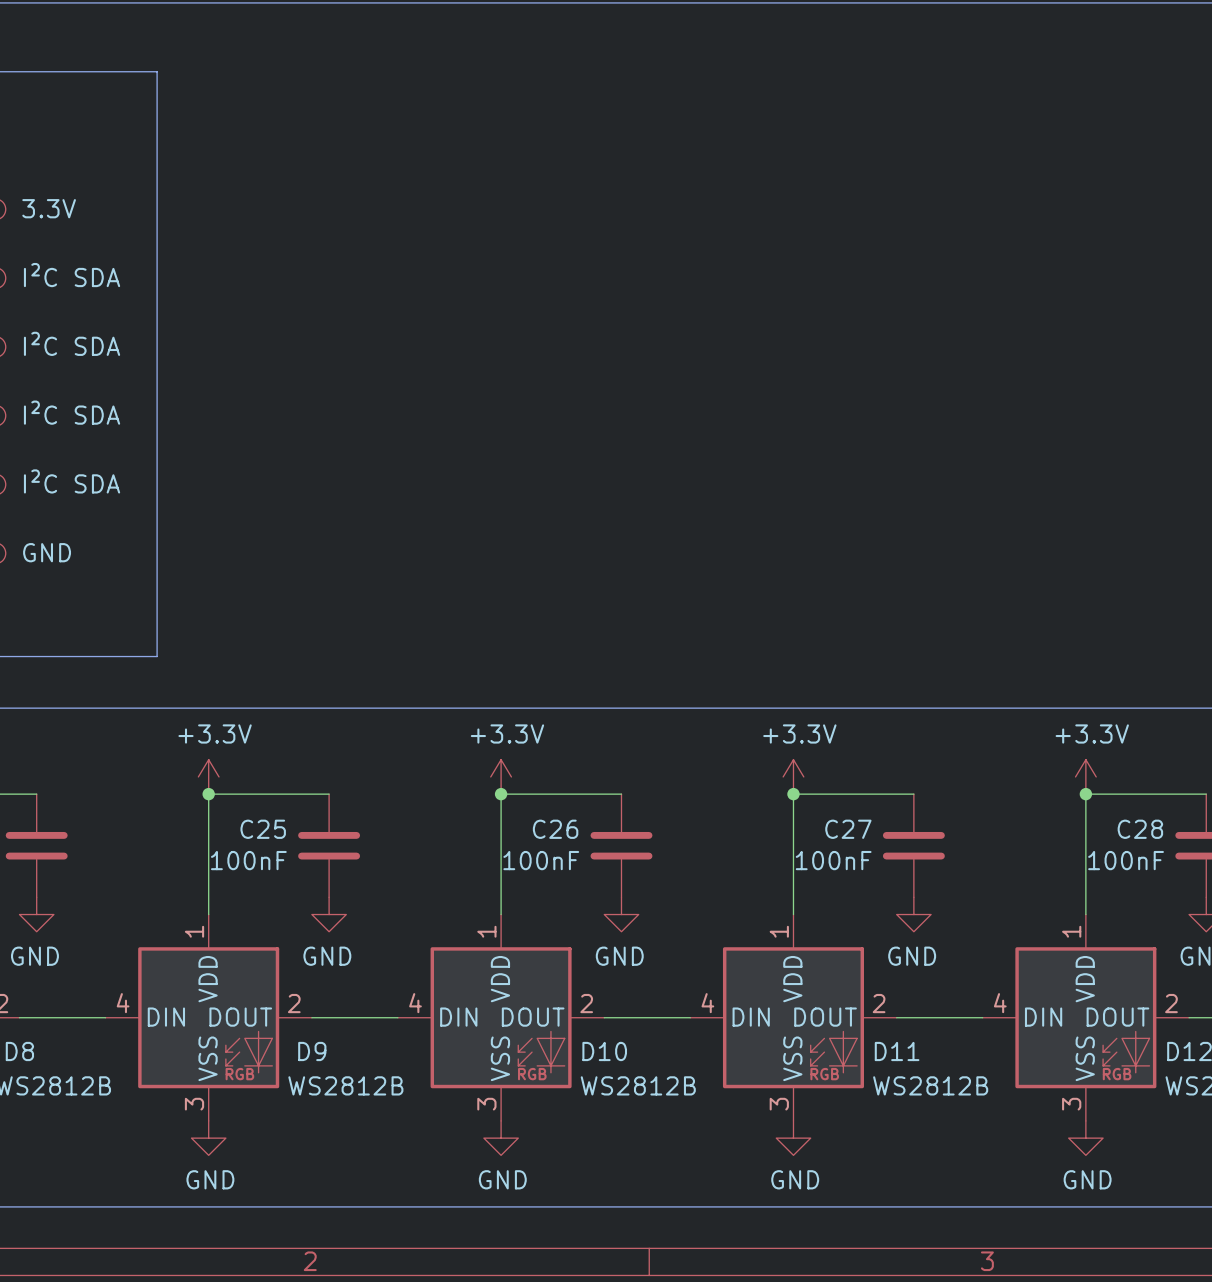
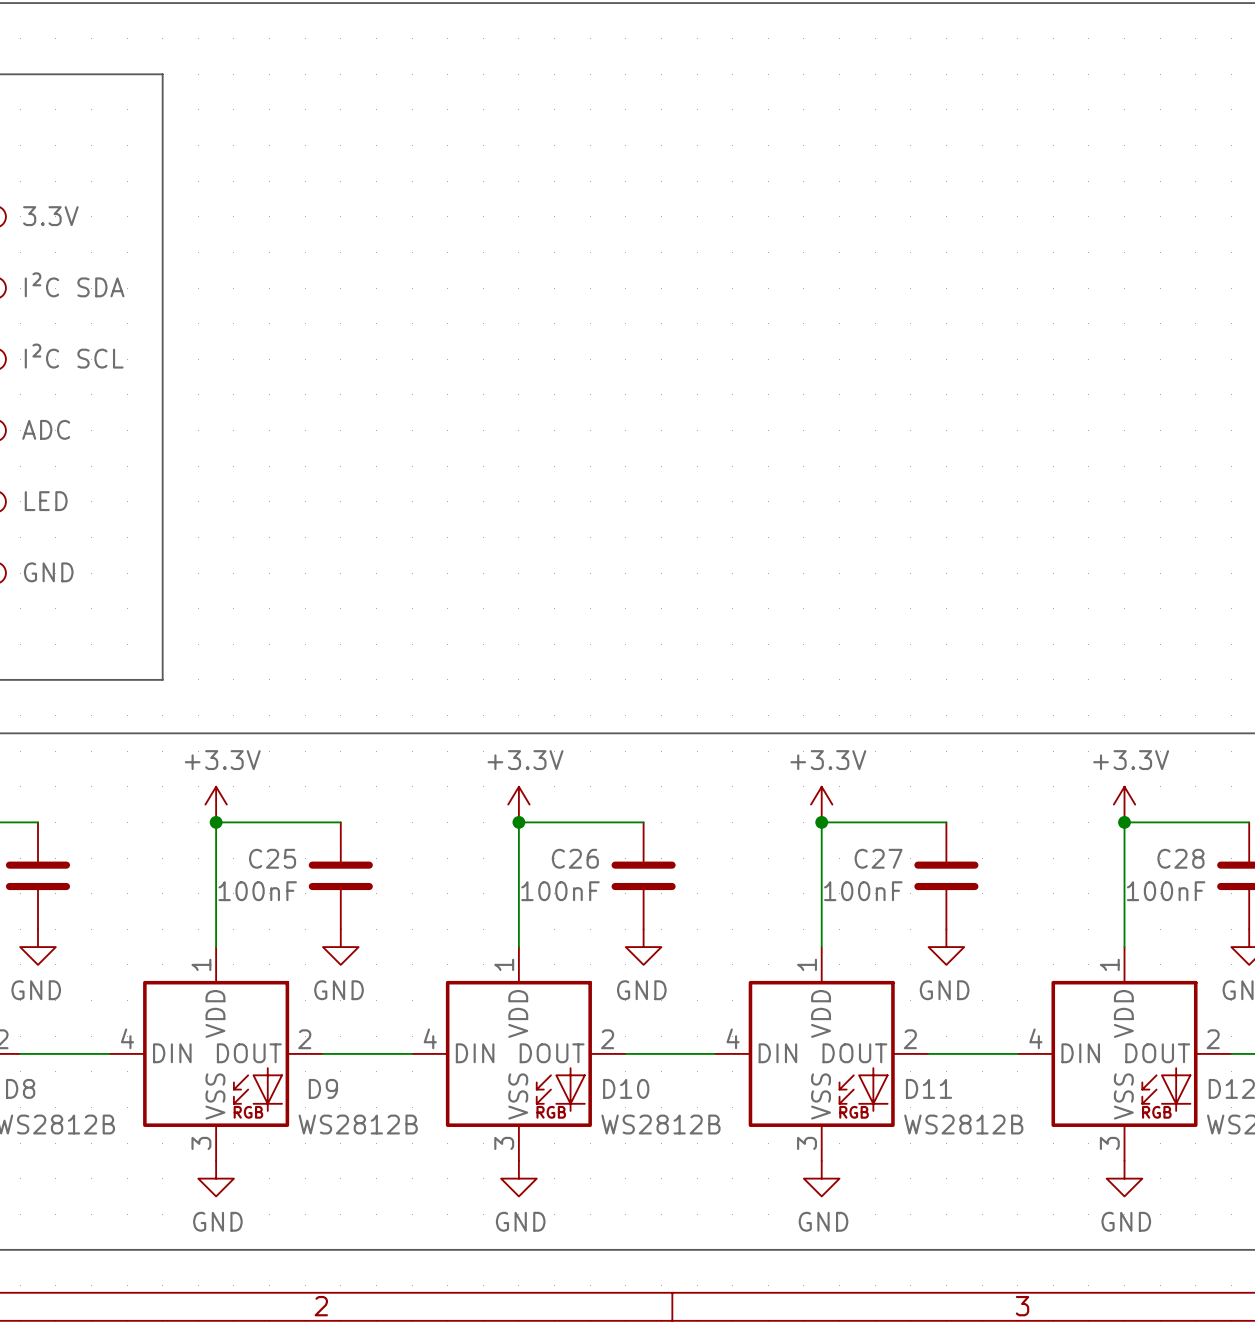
part value: I²C SDA (72, 343) -> I²C SCL (74, 356)
part value: I²C SDA (72, 412) -> ADC (46, 429)
part value: I²C SDA (72, 481) -> LED (46, 501)

